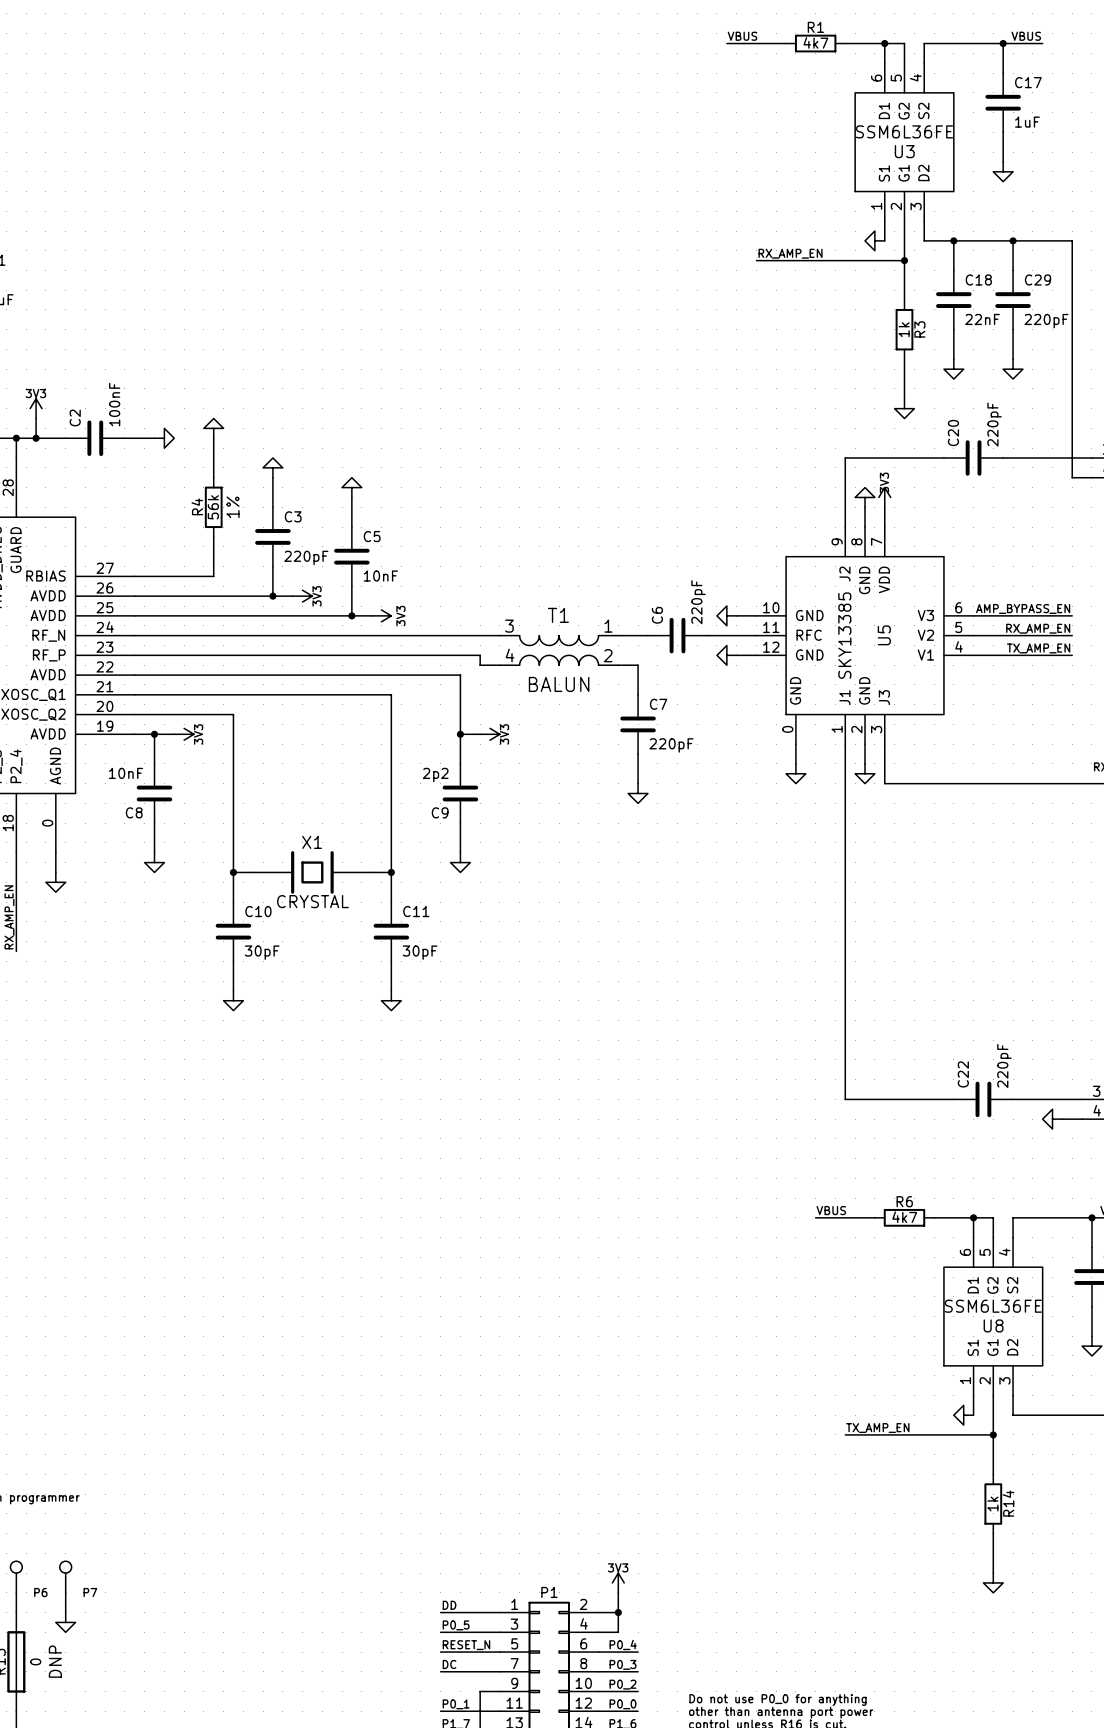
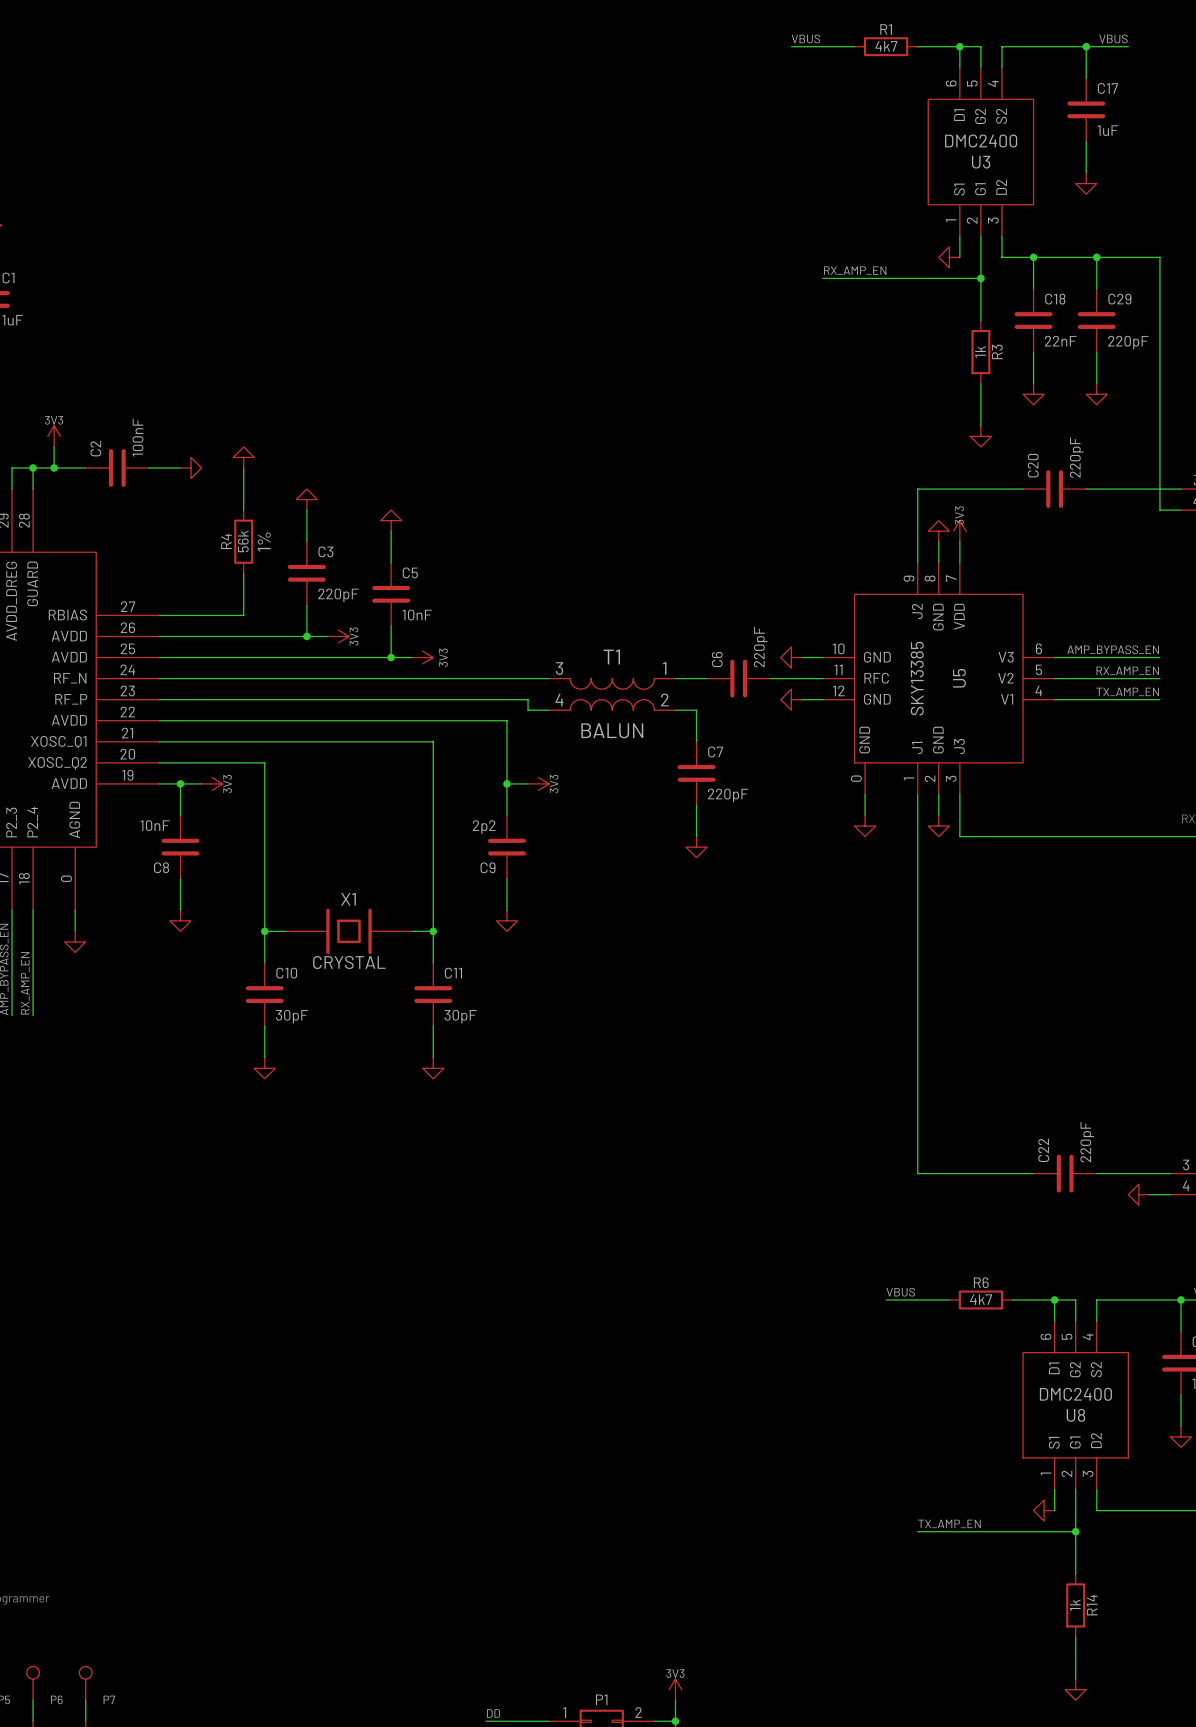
U3 value: SSM6L36FE (904, 131) -> DMC2400 (981, 141)
U8 value: SSM6L36FE (993, 1306) -> DMC2400 (1075, 1394)

